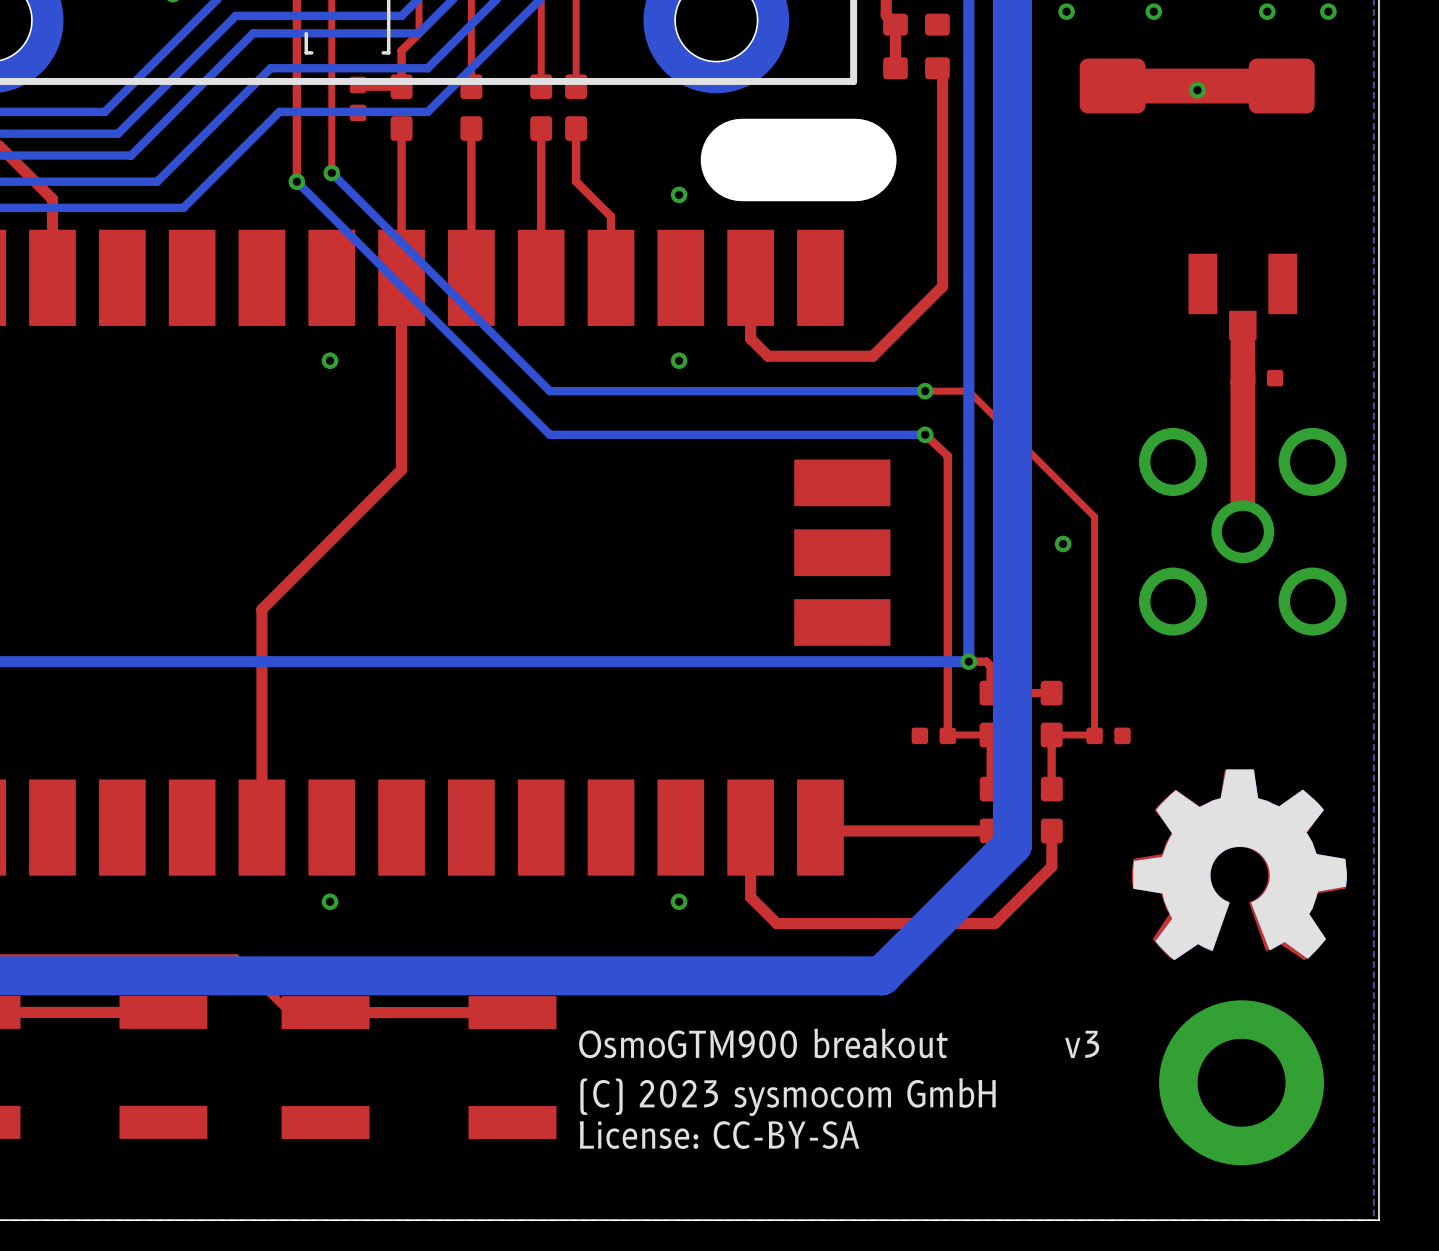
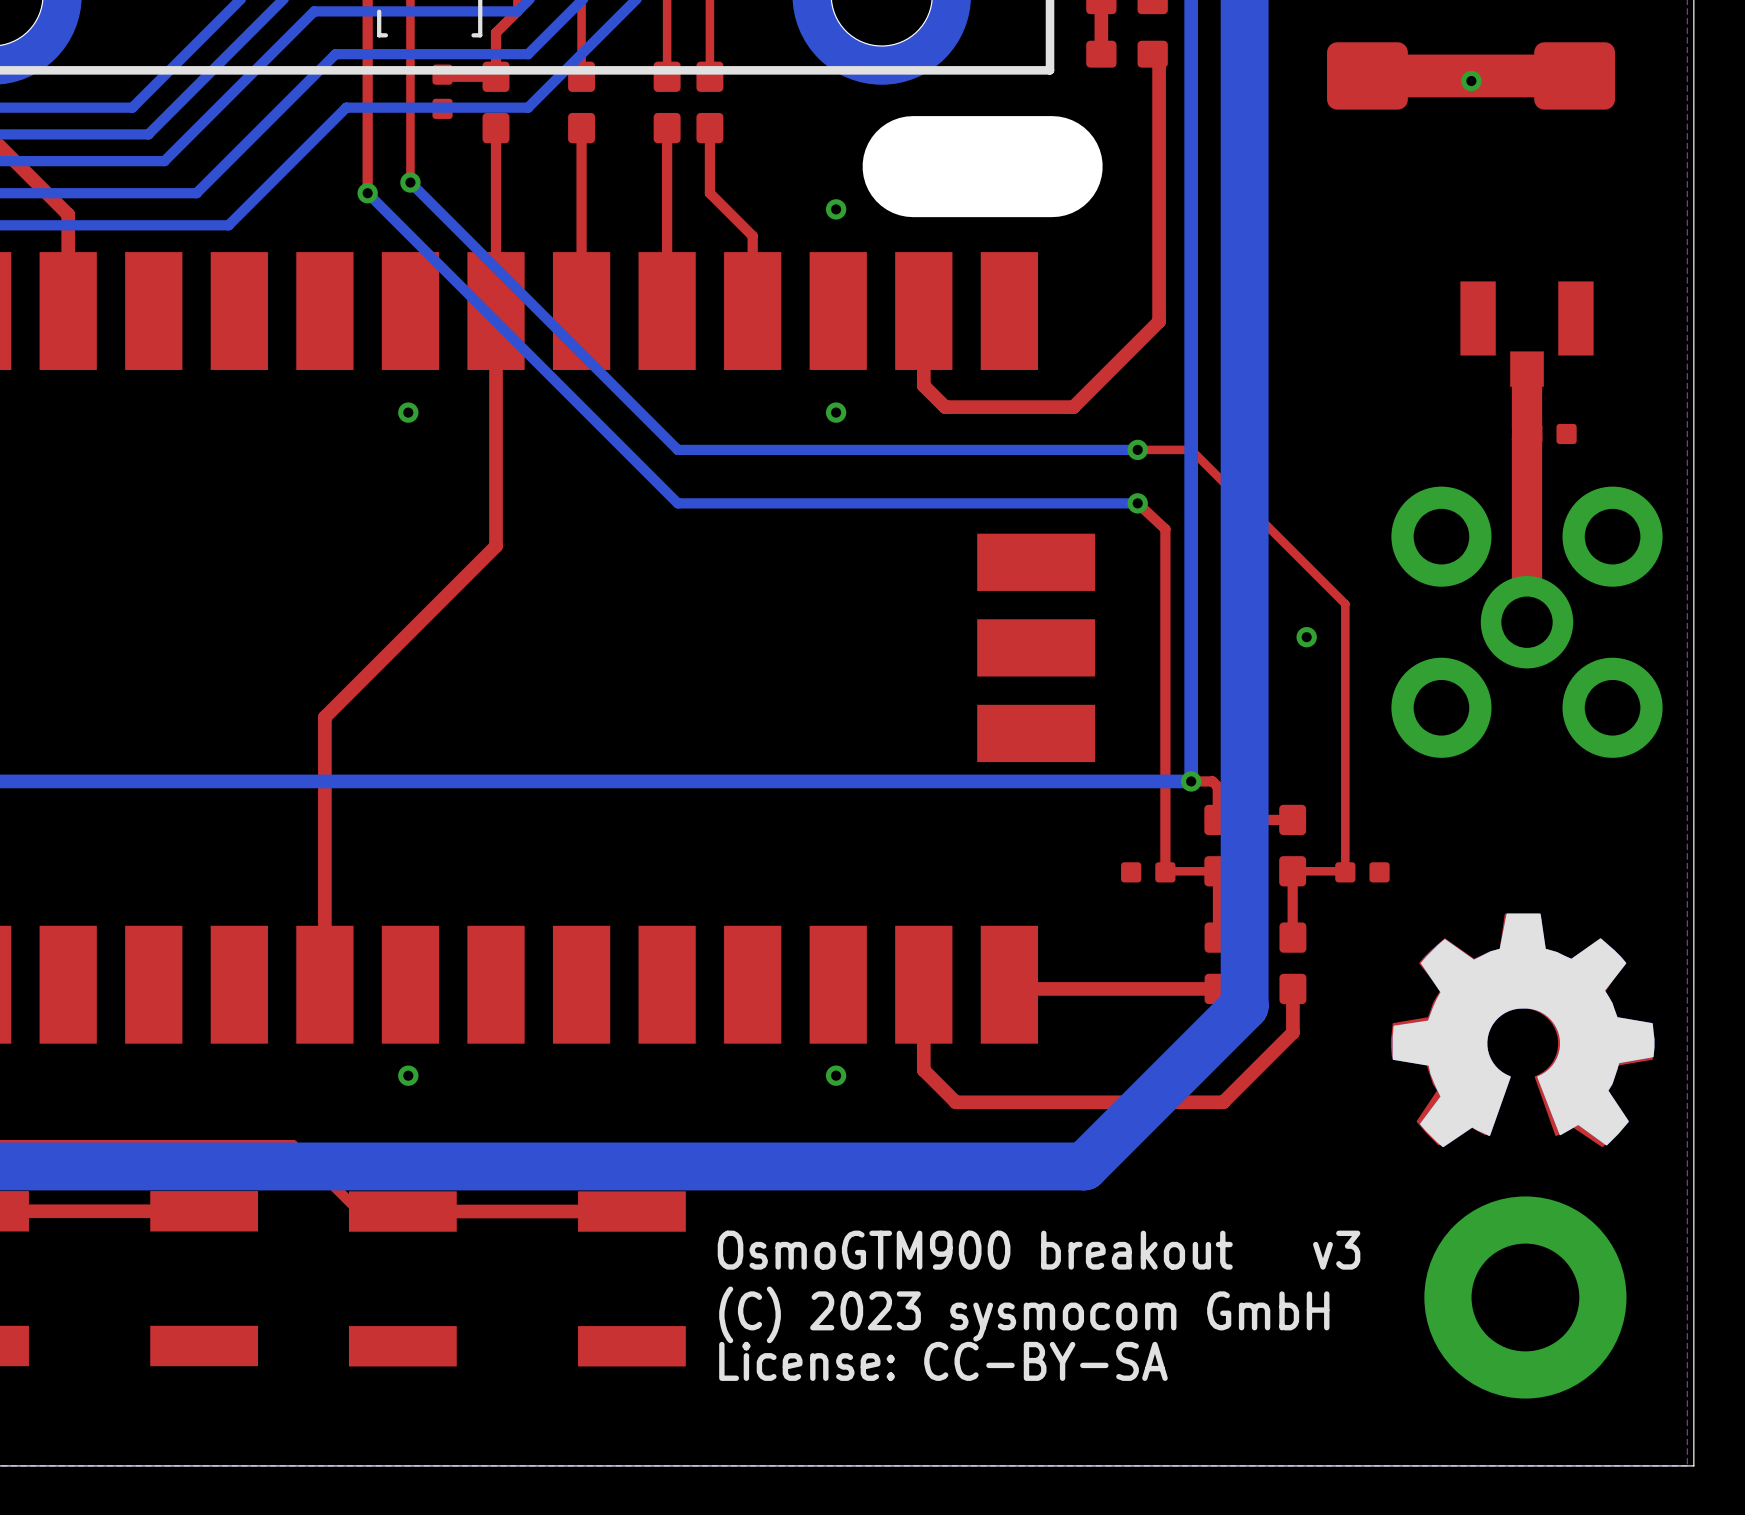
part footprint: [1138, 427, 1347, 636] -> [1391, 486, 1663, 758]

